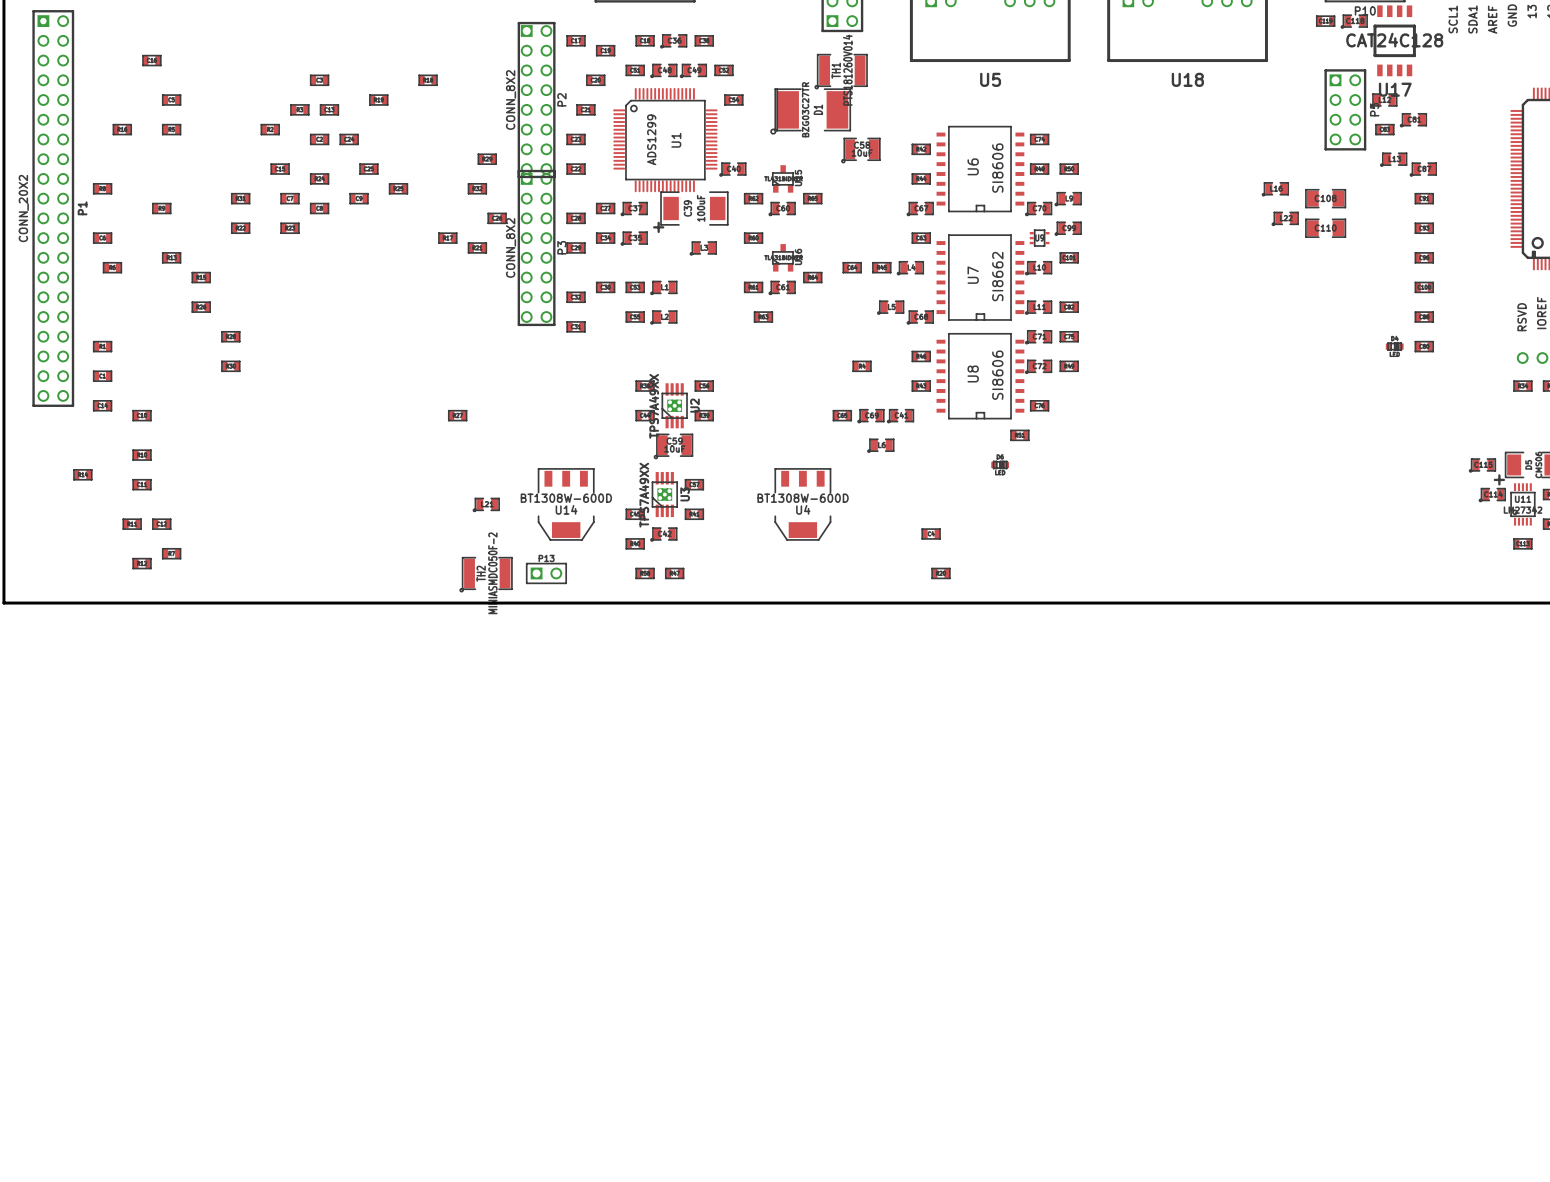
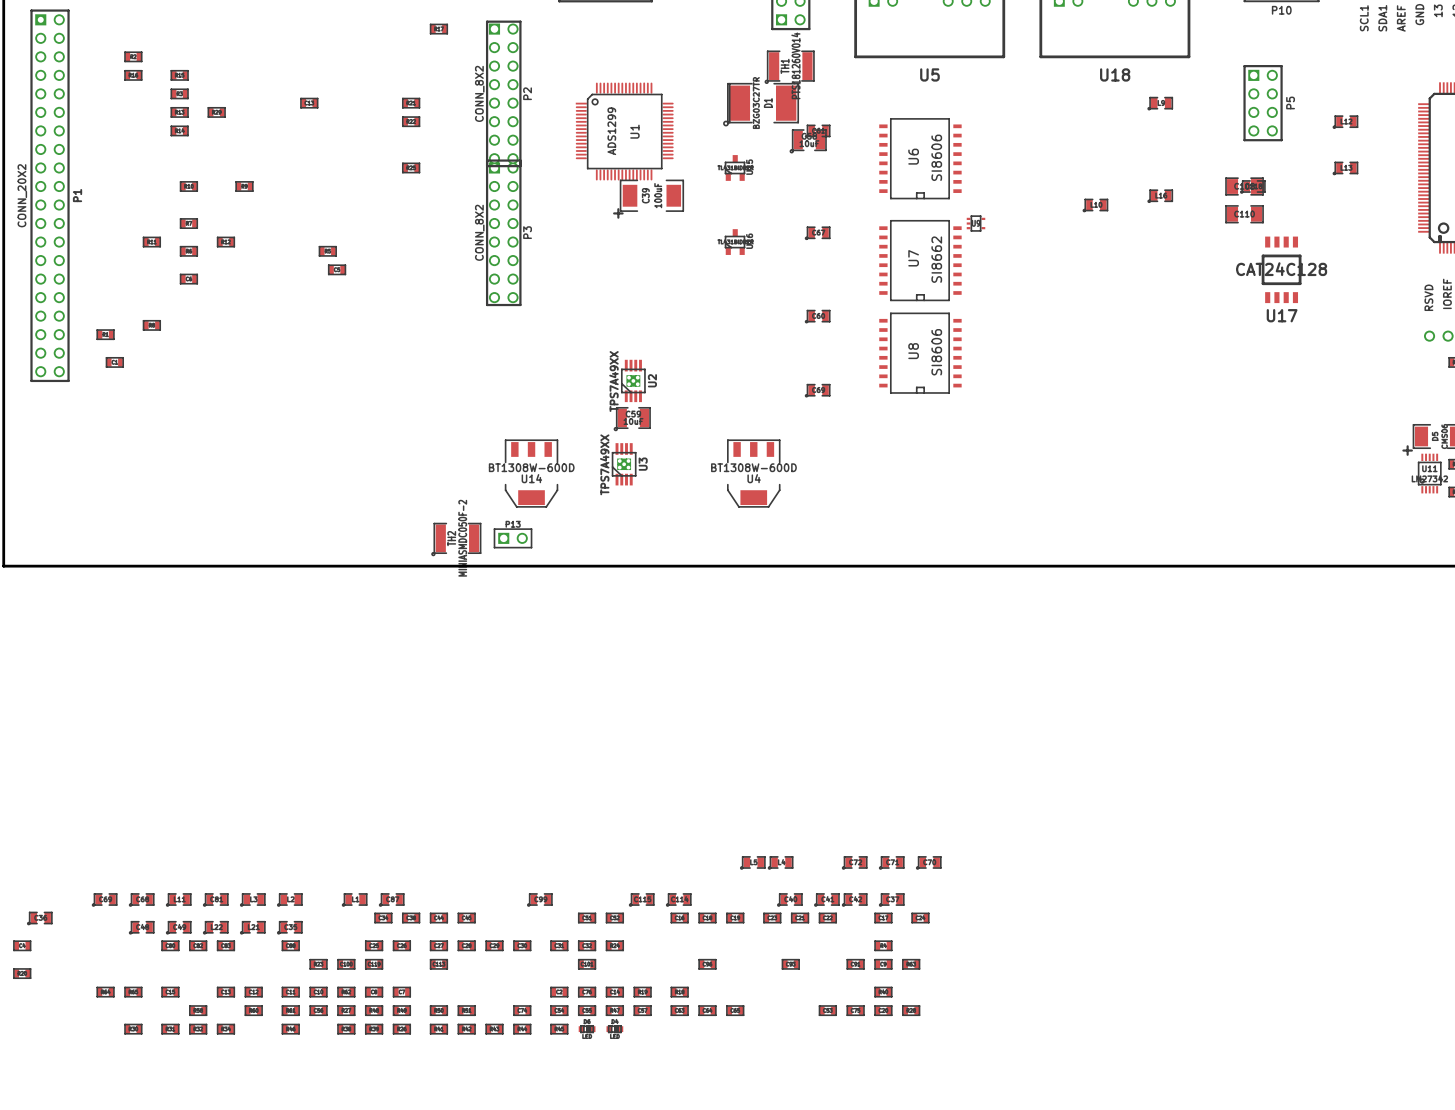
part position: (1325, 21) -> (374, 964)
part position: (1354, 21) -> (1252, 186)
part position: (576, 40) -> (883, 918)
part position: (645, 40) -> (707, 918)
part position: (704, 40) -> (411, 918)
U17 position: (1394, 40) -> (1281, 269)
part position: (673, 41) -> (39, 918)
part position: (605, 50) -> (735, 918)
part position: (151, 60) -> (679, 918)
part position: (635, 70) -> (587, 918)
part position: (663, 70) -> (141, 927)
part position: (693, 70) -> (178, 927)
part position: (723, 70) -> (614, 918)
part: (319, 80) -> none
part position: (428, 80) -> (679, 992)
part position: (595, 80) -> (883, 1010)
part position: (171, 100) -> (337, 269)
part position: (378, 100) -> (642, 992)
part position: (733, 100) -> (559, 1010)
part position: (1383, 100) -> (1345, 122)
part position: (299, 109) -> (179, 93)
part position: (585, 109) -> (800, 918)
part position: (1413, 120) -> (215, 899)
part position: (122, 129) -> (133, 75)
part position: (171, 129) -> (327, 251)
part position: (270, 129) -> (133, 56)
part position: (1384, 129) -> (225, 945)
part position: (319, 139) -> (559, 992)
part position: (349, 139) -> (920, 918)
part position: (576, 139) -> (772, 918)
part position: (1039, 139) -> (522, 1010)
part position: (921, 149) -> (466, 1029)
part position: (487, 159) -> (216, 112)
part position: (1393, 159) -> (1345, 168)
part position: (280, 169) -> (170, 992)
part position: (368, 169) -> (374, 945)
part position: (576, 169) -> (827, 918)
part position: (732, 169) -> (789, 899)
part position: (1039, 169) -> (374, 1010)
part position: (1069, 169) -> (438, 1010)
part position: (1423, 169) -> (391, 899)
part position: (319, 178) -> (614, 945)
part position: (921, 178) -> (522, 1029)
part position: (102, 188) -> (151, 325)
part position: (398, 188) -> (411, 167)
part position: (477, 188) -> (198, 1029)
part position: (1275, 189) -> (1160, 196)
part position: (240, 198) -> (170, 1029)
part position: (290, 198) -> (401, 992)
part position: (359, 198) -> (883, 964)
part position: (753, 198) -> (346, 992)
part position: (812, 198) -> (133, 992)
part position: (1424, 198) -> (855, 964)
part position: (1068, 199) -> (1160, 103)
part position: (161, 208) -> (244, 186)
part position: (319, 208) -> (374, 992)
part position: (605, 208) -> (438, 945)
part position: (634, 209) -> (891, 899)
part position: (782, 209) -> (817, 316)
part position: (920, 209) -> (817, 233)
part position: (1038, 209) -> (928, 862)
part position: (497, 218) -> (401, 945)
part position: (576, 218) -> (466, 945)
part position: (1285, 218) -> (215, 927)
part position: (240, 228) -> (411, 121)
part position: (290, 228) -> (318, 964)
part position: (1068, 228) -> (539, 899)
part position: (1424, 228) -> (790, 964)
part position: (102, 238) -> (188, 279)
part position: (447, 238) -> (438, 29)
part position: (605, 238) -> (383, 918)
part position: (634, 238) -> (289, 927)
part position: (753, 238) -> (253, 1010)
part position: (921, 238) -> (679, 1010)
part position: (477, 247) -> (411, 103)
part position: (576, 247) -> (494, 945)
part position: (703, 248) -> (252, 899)
part position: (171, 257) -> (179, 112)
part position: (1069, 257) -> (587, 964)
part position: (1424, 257) -> (707, 964)
part position: (112, 267) -> (188, 251)
part position: (852, 267) -> (707, 1010)
part position: (881, 267) -> (559, 1029)
part position: (910, 268) -> (780, 862)
part position: (1038, 268) -> (1095, 205)
part position: (201, 277) -> (179, 75)
part position: (812, 277) -> (105, 992)
part position: (605, 287) -> (522, 945)
part position: (635, 287) -> (827, 1010)
part position: (663, 287) -> (354, 899)
part position: (753, 287) -> (290, 1010)
part position: (782, 287) -> (817, 131)
part position: (1424, 287) -> (346, 964)
part position: (576, 297) -> (587, 945)
part position: (201, 307) -> (401, 1029)
part position: (890, 307) -> (752, 862)
part position: (1038, 307) -> (178, 899)
part position: (1069, 307) -> (198, 945)
part position: (635, 317) -> (587, 1010)
part position: (663, 317) -> (289, 899)
part position: (763, 317) -> (911, 964)
part position: (920, 317) -> (141, 899)
part position: (1424, 317) -> (290, 945)
part position: (576, 326) -> (559, 945)
part position: (230, 336) -> (911, 1010)
part position: (1069, 336) -> (855, 1010)
part position: (1038, 337) -> (891, 862)
part position: (102, 346) -> (105, 334)
part position: (1394, 346) -> (614, 1029)
part position: (1424, 346) -> (170, 945)
part position: (921, 356) -> (290, 1029)
part position: (230, 366) -> (133, 1029)
part position: (862, 366) -> (883, 945)
part position: (1038, 366) -> (854, 862)
part position: (1069, 366) -> (401, 1010)
part position: (102, 376) -> (114, 362)
part position: (645, 386) -> (346, 1029)
part position: (704, 386) -> (318, 1010)
part position: (921, 386) -> (494, 1029)
part position: (1522, 386) -> (225, 1029)
part position: (102, 405) -> (614, 992)
part position: (1039, 405) -> (587, 992)
part position: (142, 415) -> (318, 992)
part position: (457, 415) -> (346, 1010)
part position: (645, 415) -> (438, 918)
part position: (704, 415) -> (374, 1029)
part position: (842, 415) -> (735, 1010)
part position: (900, 416) -> (826, 899)
part position: (1019, 435) -> (466, 1010)
part: (880, 445) -> none
part position: (142, 455) -> (188, 186)
part position: (1000, 464) -> (587, 1029)
part position: (1482, 465) -> (641, 899)
part position: (82, 474) -> (179, 130)
part position: (142, 484) -> (290, 992)
part position: (694, 484) -> (642, 1010)
part position: (1492, 495) -> (678, 899)
part position: (486, 504) -> (252, 927)
part position: (635, 514) -> (466, 918)
part position: (694, 514) -> (438, 1029)
part position: (132, 524) -> (151, 242)
part position: (161, 524) -> (253, 992)
part position: (663, 534) -> (854, 899)
part position: (931, 534) -> (22, 945)
part position: (635, 543) -> (883, 992)
part position: (1522, 543) -> (438, 964)
part position: (171, 553) -> (188, 223)
part position: (142, 563) -> (225, 242)
part position: (645, 573) -> (198, 1010)
part position: (674, 573) -> (614, 1010)
part position: (940, 573) -> (22, 973)
part: none -> (104, 899)
part: none -> (225, 992)

